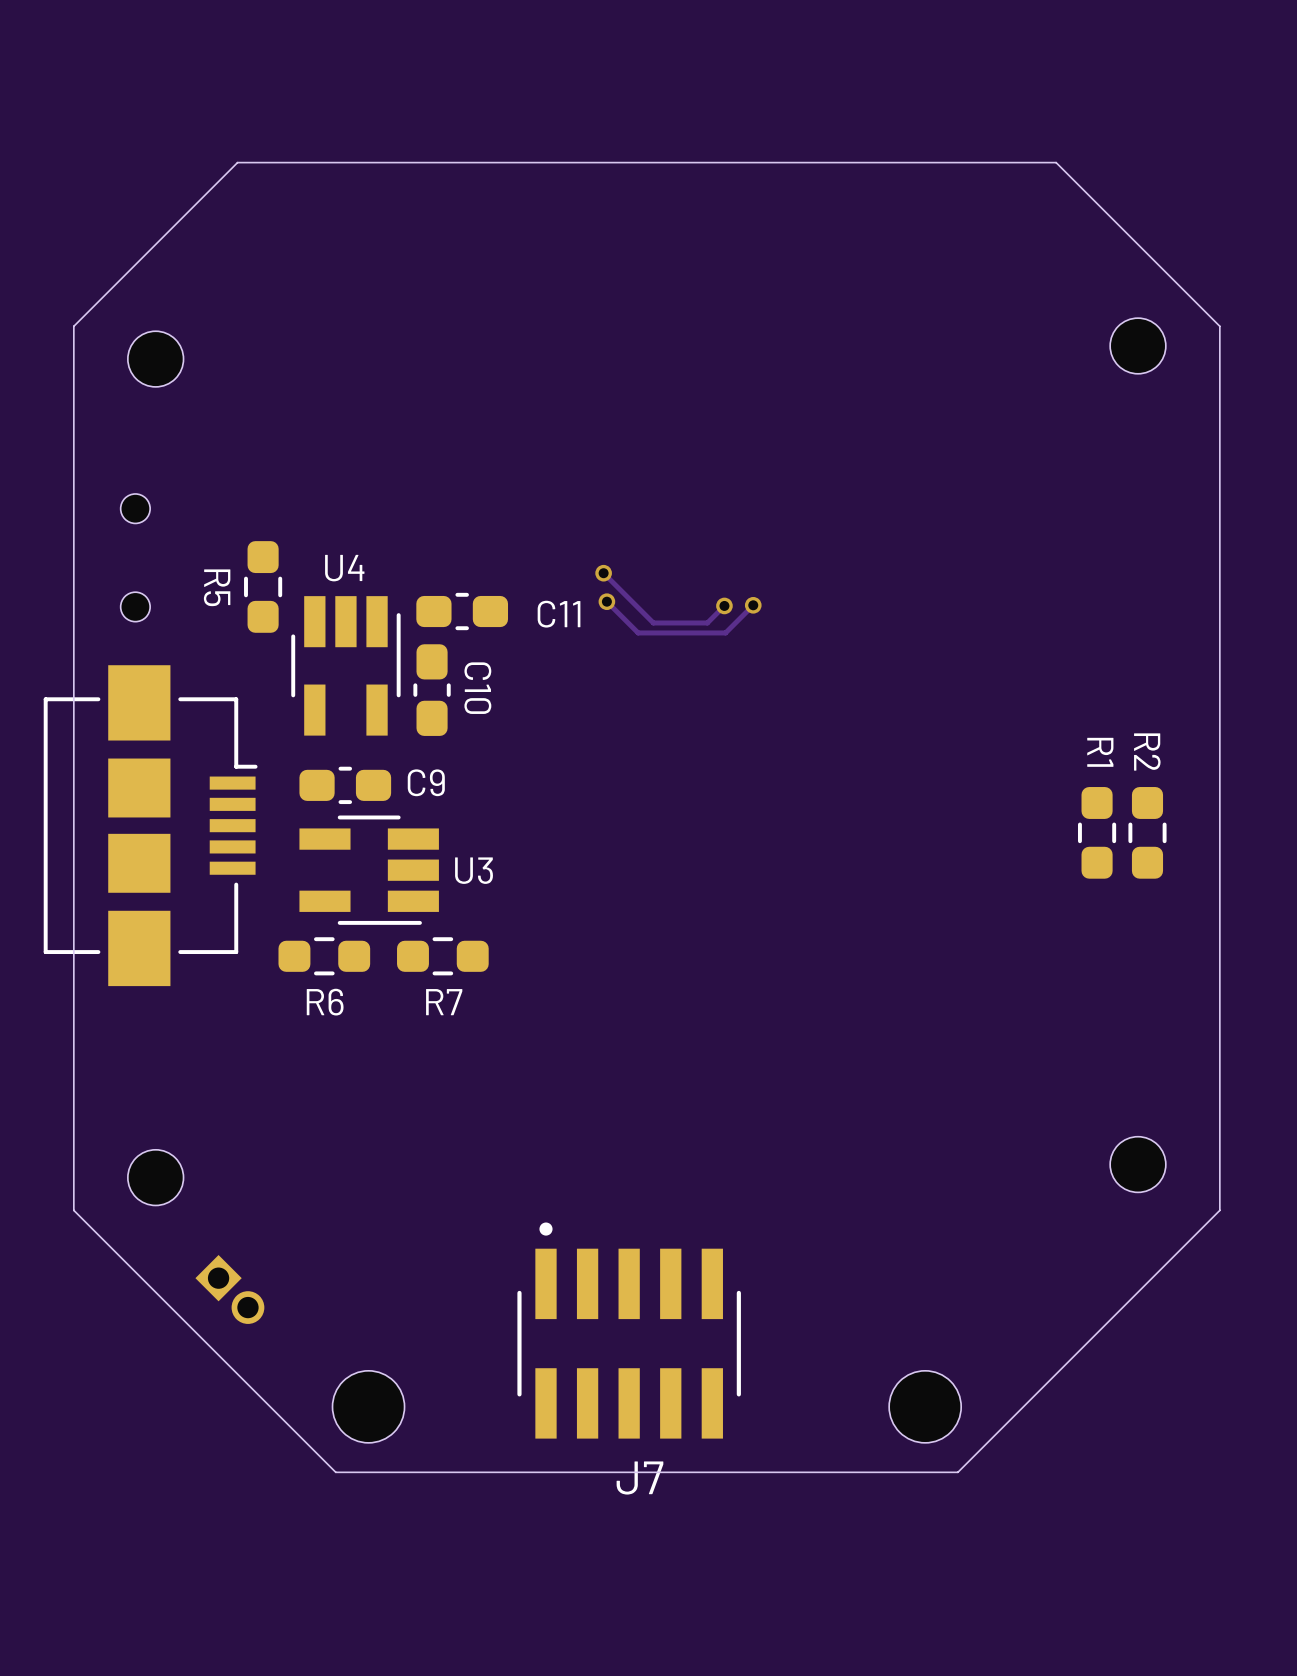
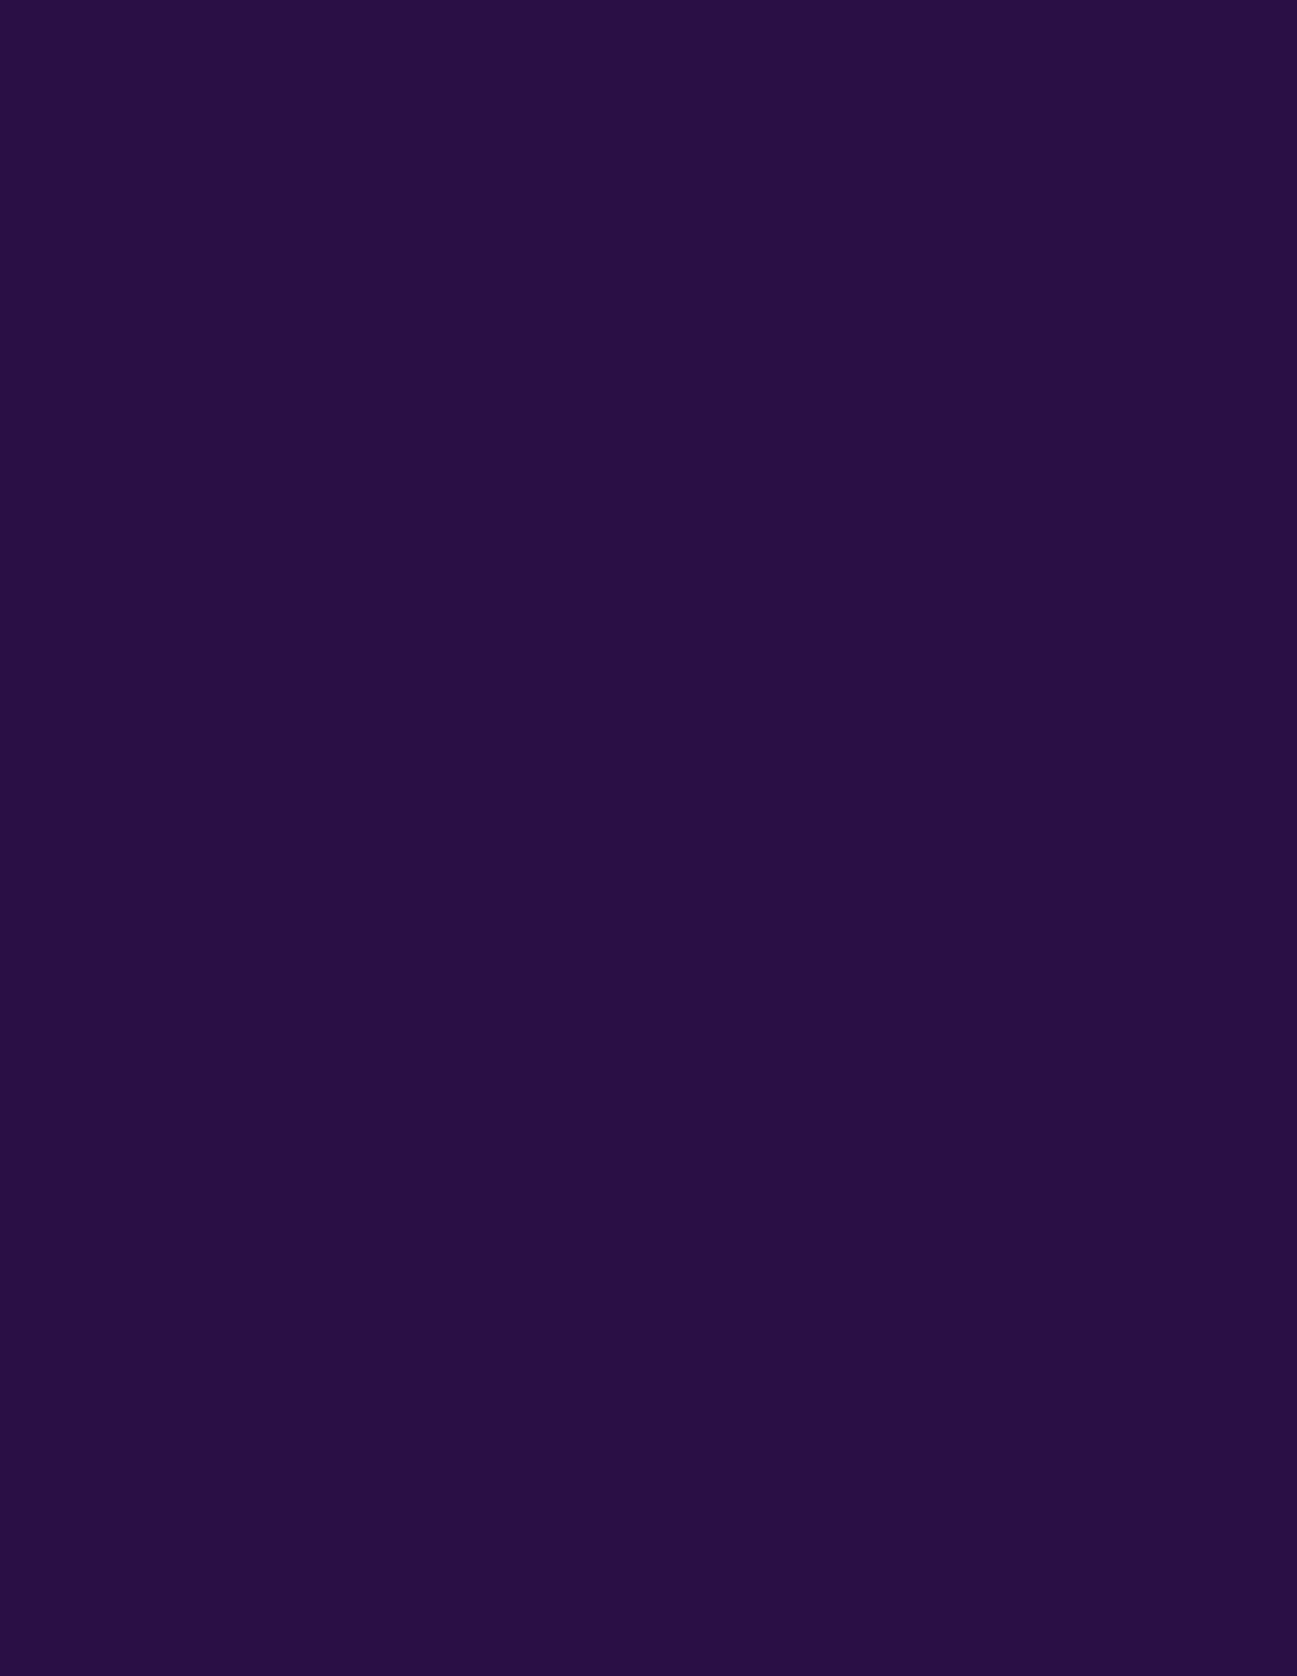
board edge: (1056, 162) (237, 162) (73, 326) (73, 1210) (335, 1472) (957, 1472) (1219, 1210) (1219, 326) (1056, 162) -> none
part: (1137, 345) -> none
part: (155, 359) -> none
part: (135, 557) -> none
track: (603, 573) (653, 622) (707, 622) (724, 605) -> none
via: (603, 573) -> none
R5: (263, 586) -> none
track: (606, 601) (638, 632) (725, 632) (753, 605) -> none
via: (606, 601) -> none
via: (724, 605) -> none
via: (753, 605) -> none
C11: (462, 611) -> none
U4: (345, 665) -> none
C10: (432, 690) -> none
C9: (345, 785) -> none
part: (150, 825) -> none
R1: (1097, 832) -> none
R2: (1147, 832) -> none
U3: (369, 870) -> none
R6: (324, 956) -> none
R7: (442, 956) -> none
part: (1137, 1164) -> none
part: (155, 1177) -> none
part: (229, 1289) -> none
J7: (629, 1330) -> none
part: (368, 1406) -> none
part: (925, 1406) -> none

